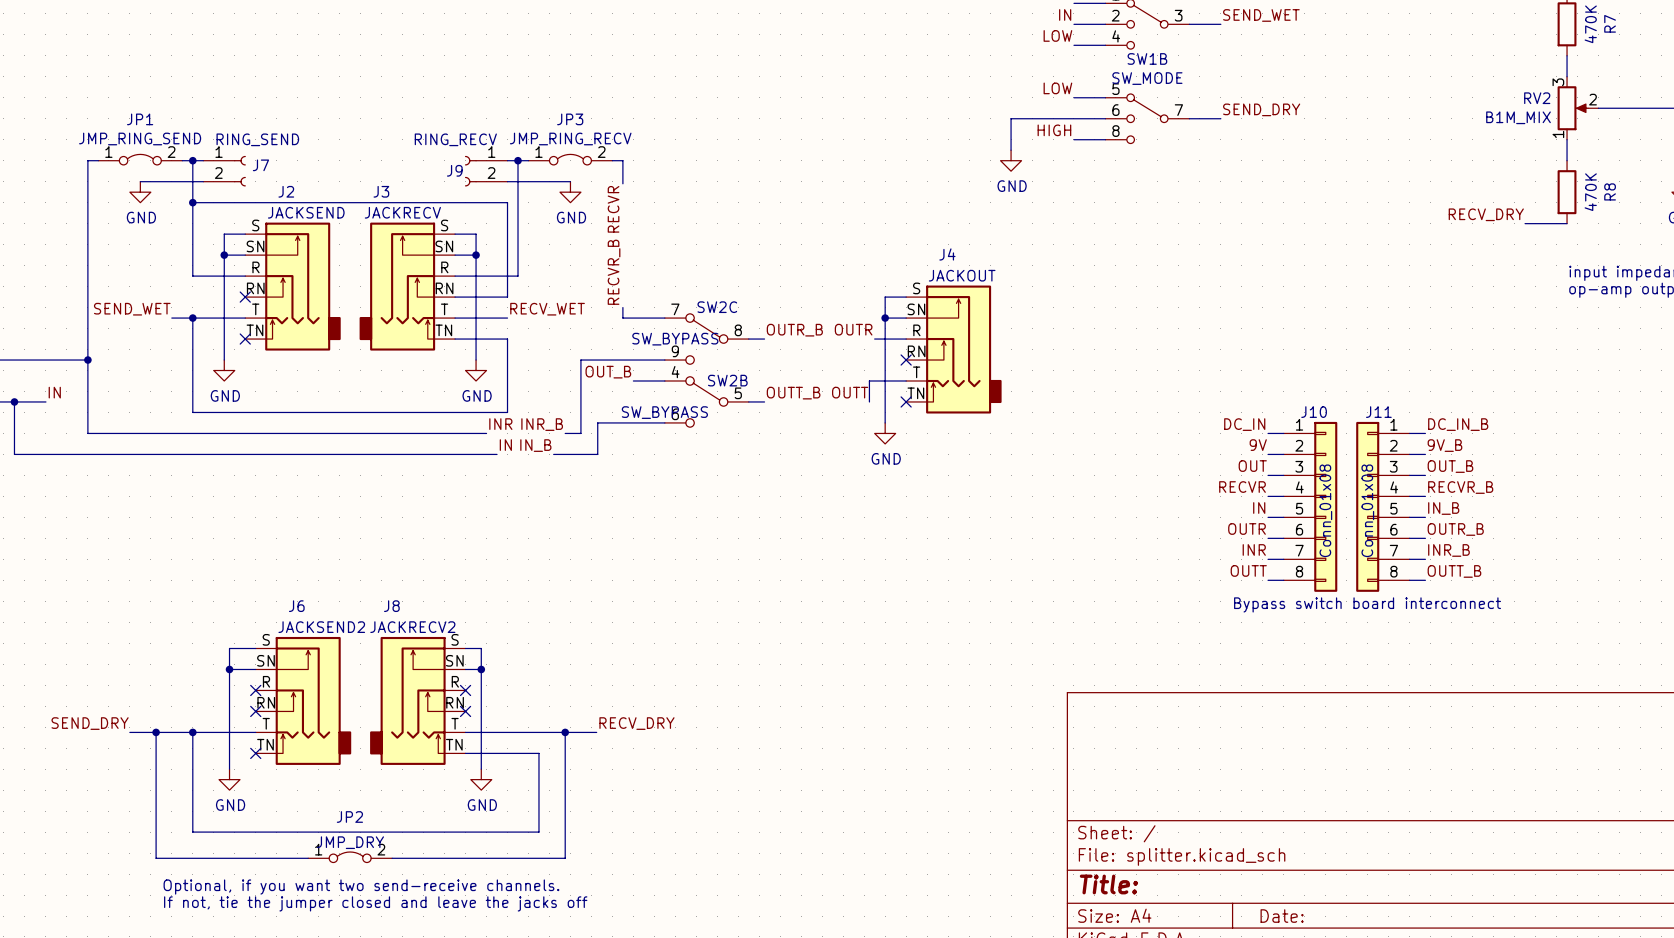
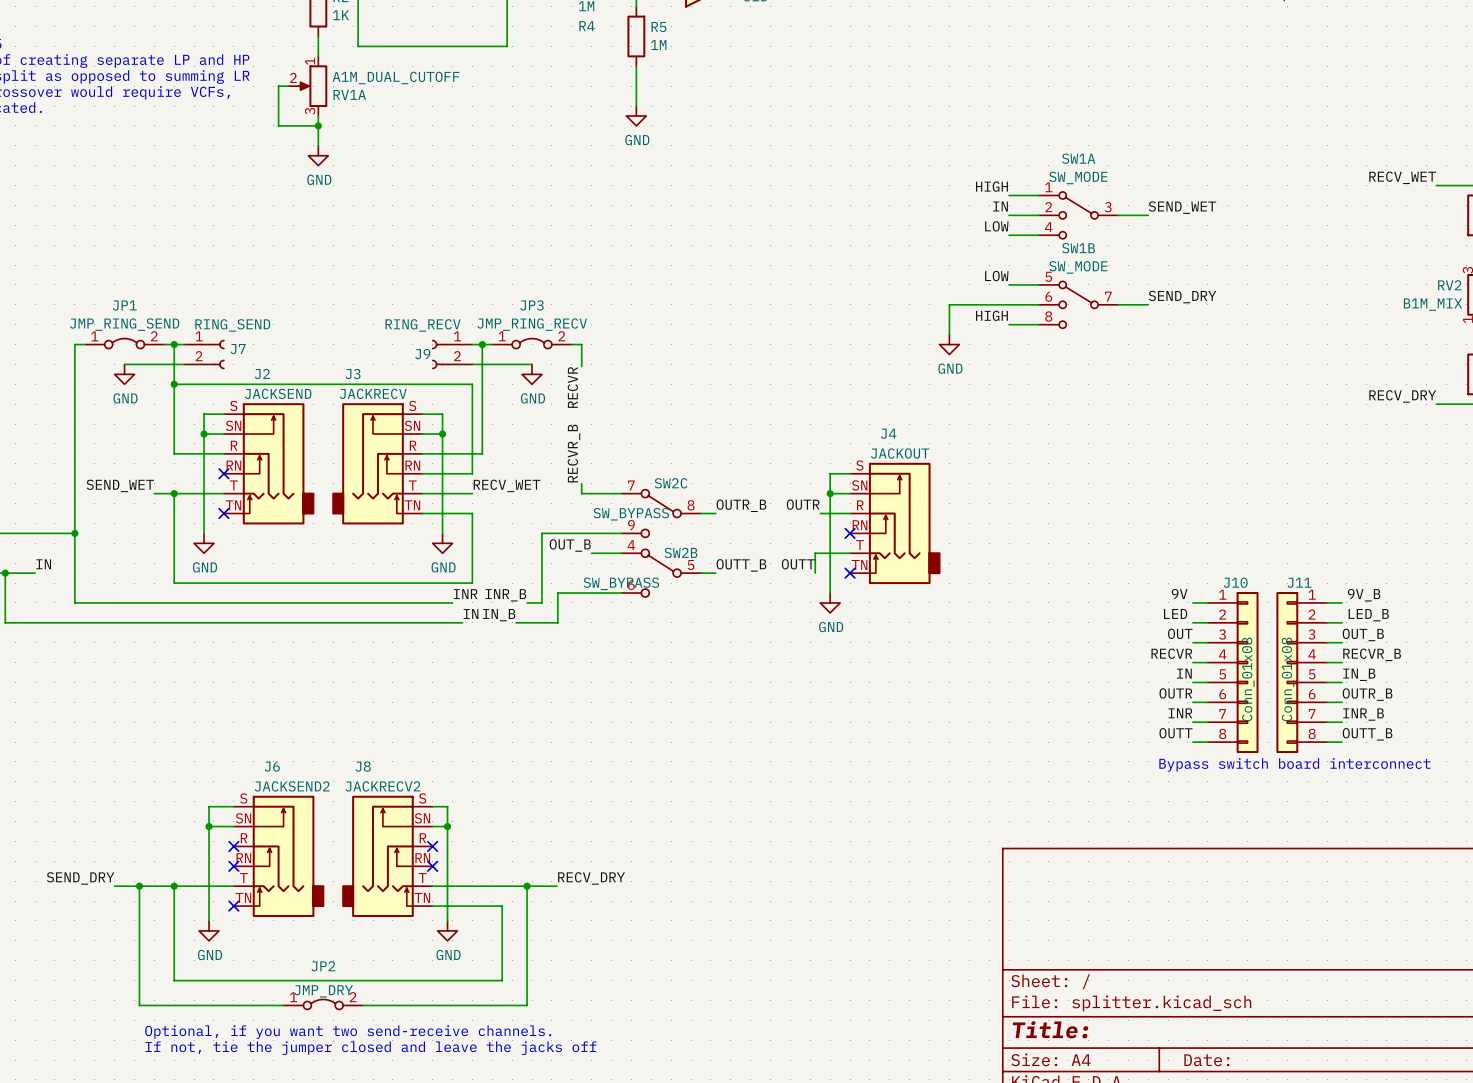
label: DC_IN (1244, 424) -> 9V (1179, 594)
label: DC_IN_B (1458, 424) -> 9V_B (1364, 595)
label: 9V (1258, 445) -> LED (1175, 613)
label: 9V_B (1444, 445) -> LED_B (1368, 615)

